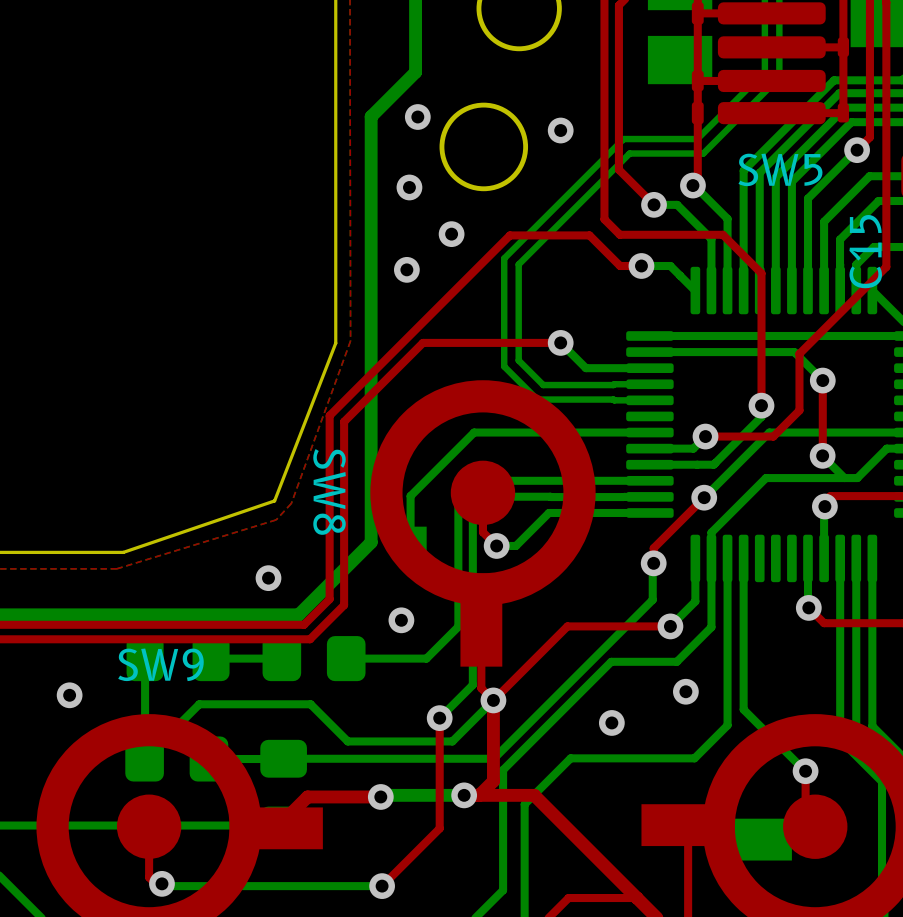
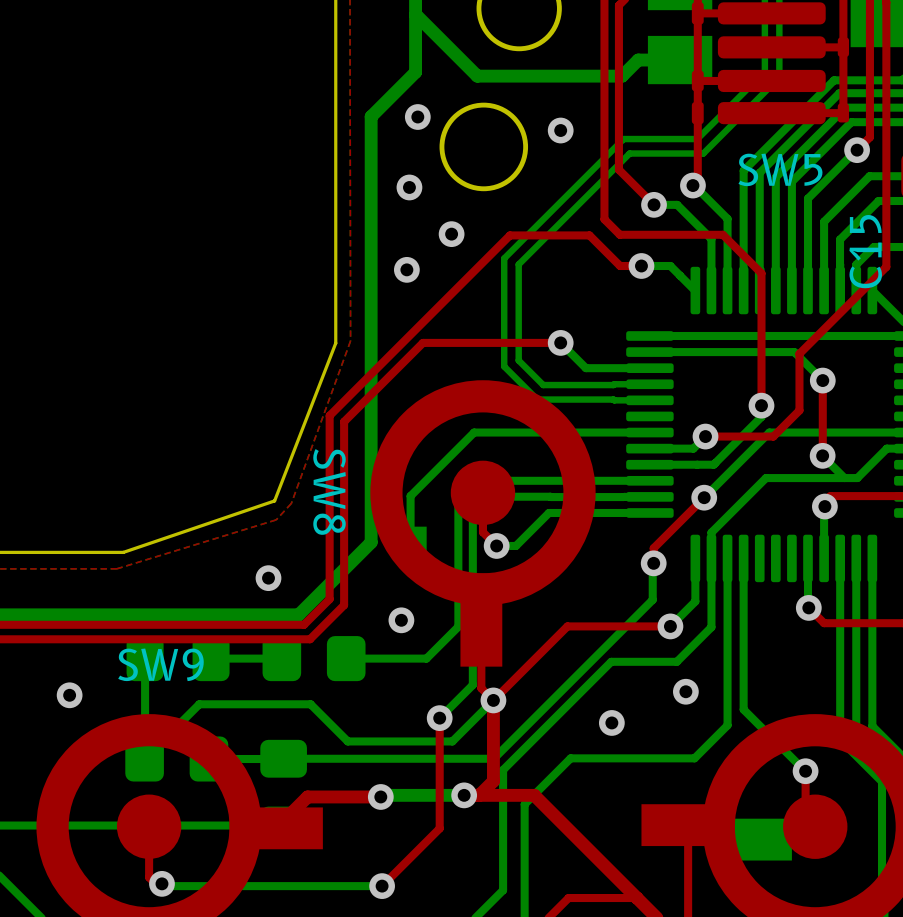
bottom track: none -> (416, 14) (477, 76) (622, 76) (638, 60) (680, 60)

